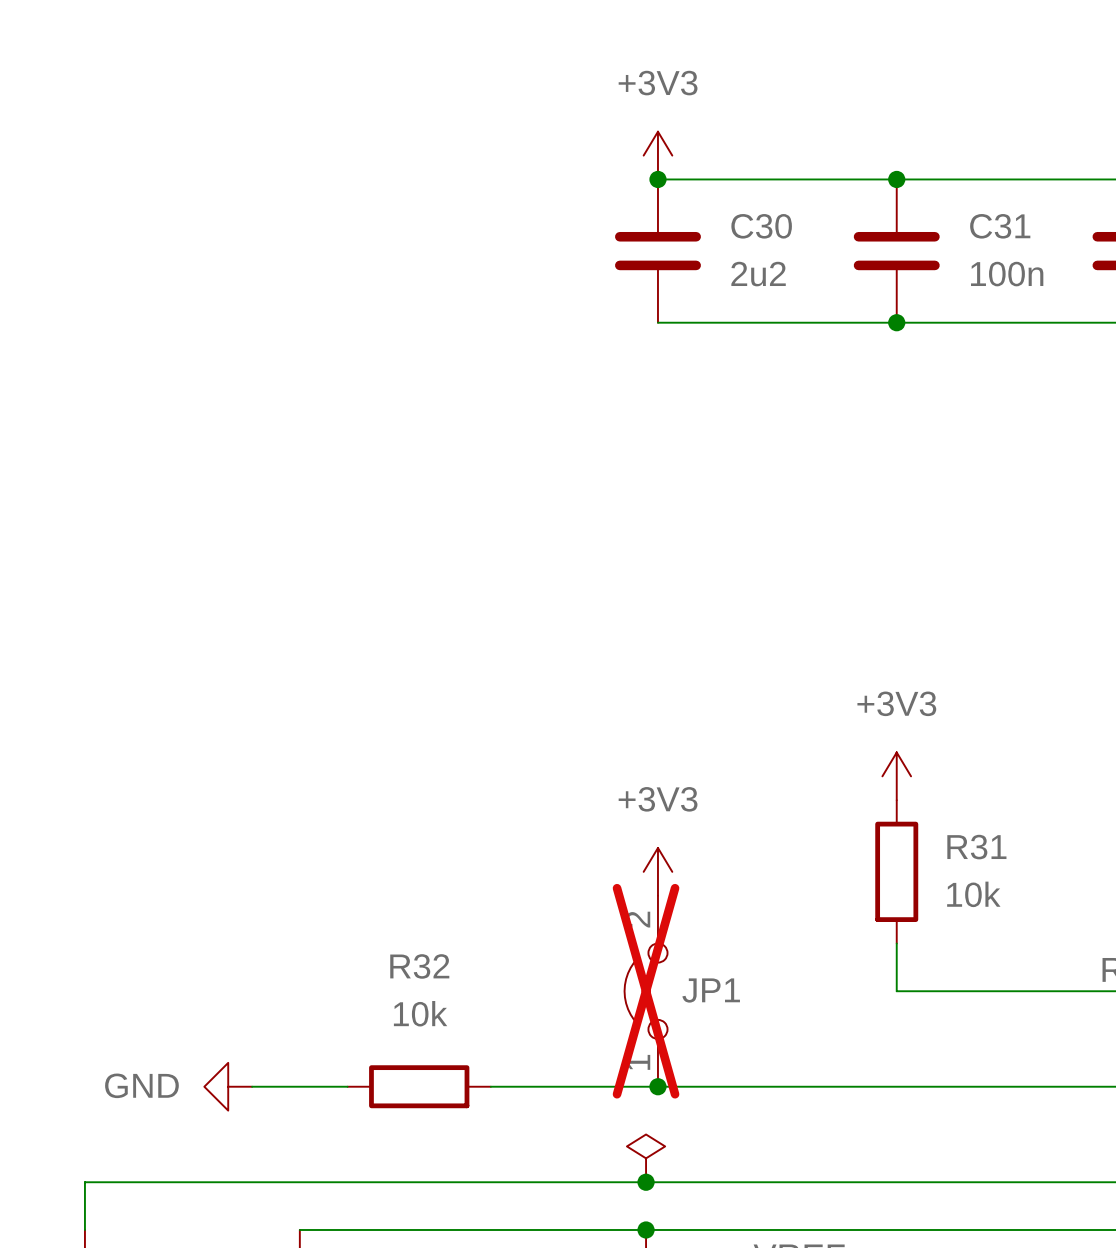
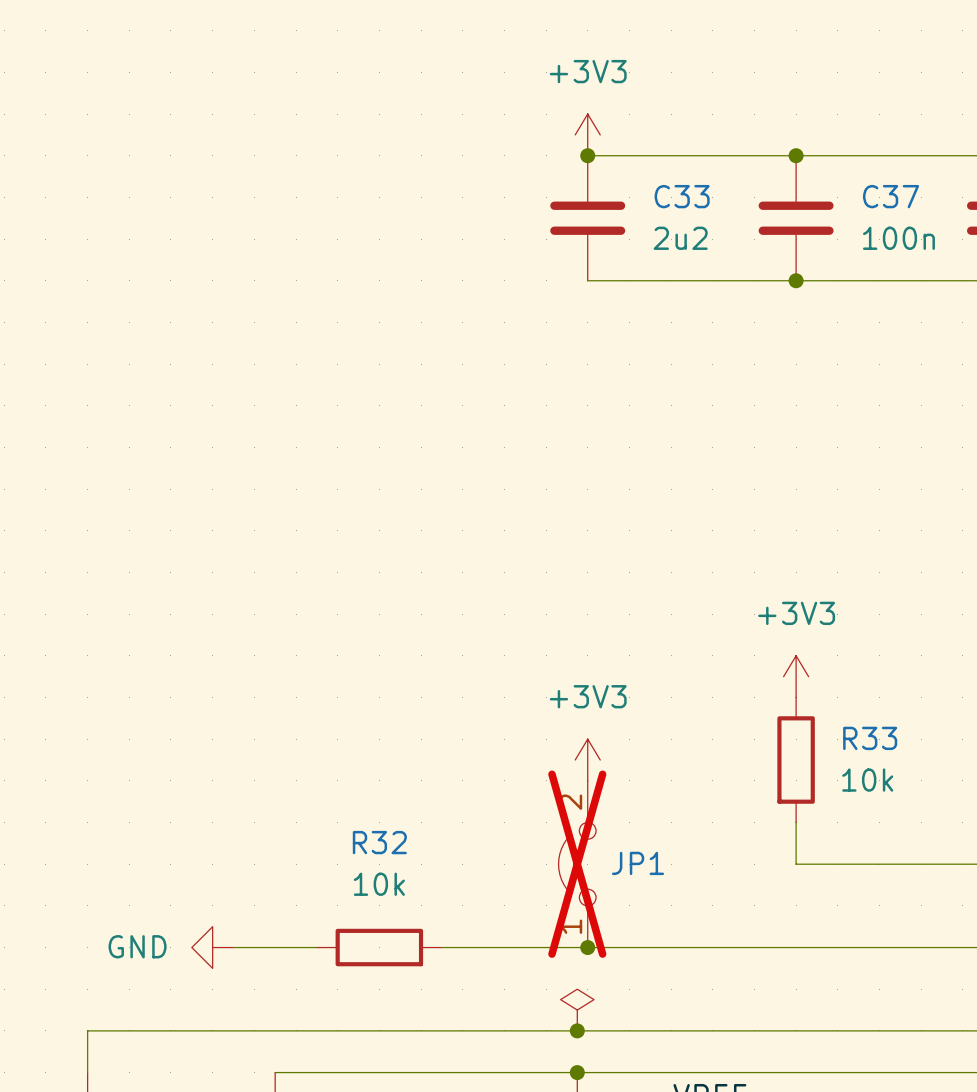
C30 name: C30 (761, 226) -> C33 (682, 196)
C31 name: C31 (1000, 226) -> C37 (891, 196)
R31 name: R31 (976, 847) -> R33 (870, 738)

